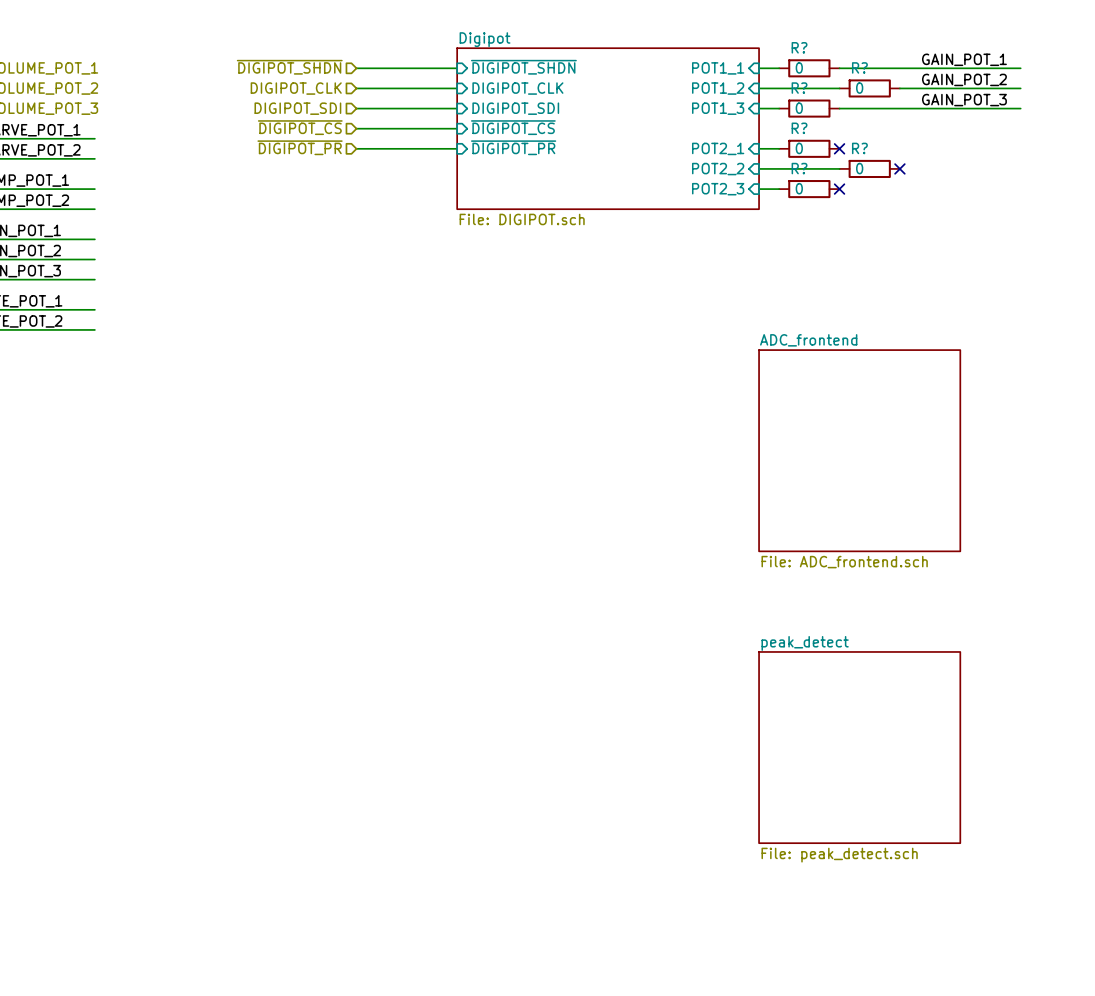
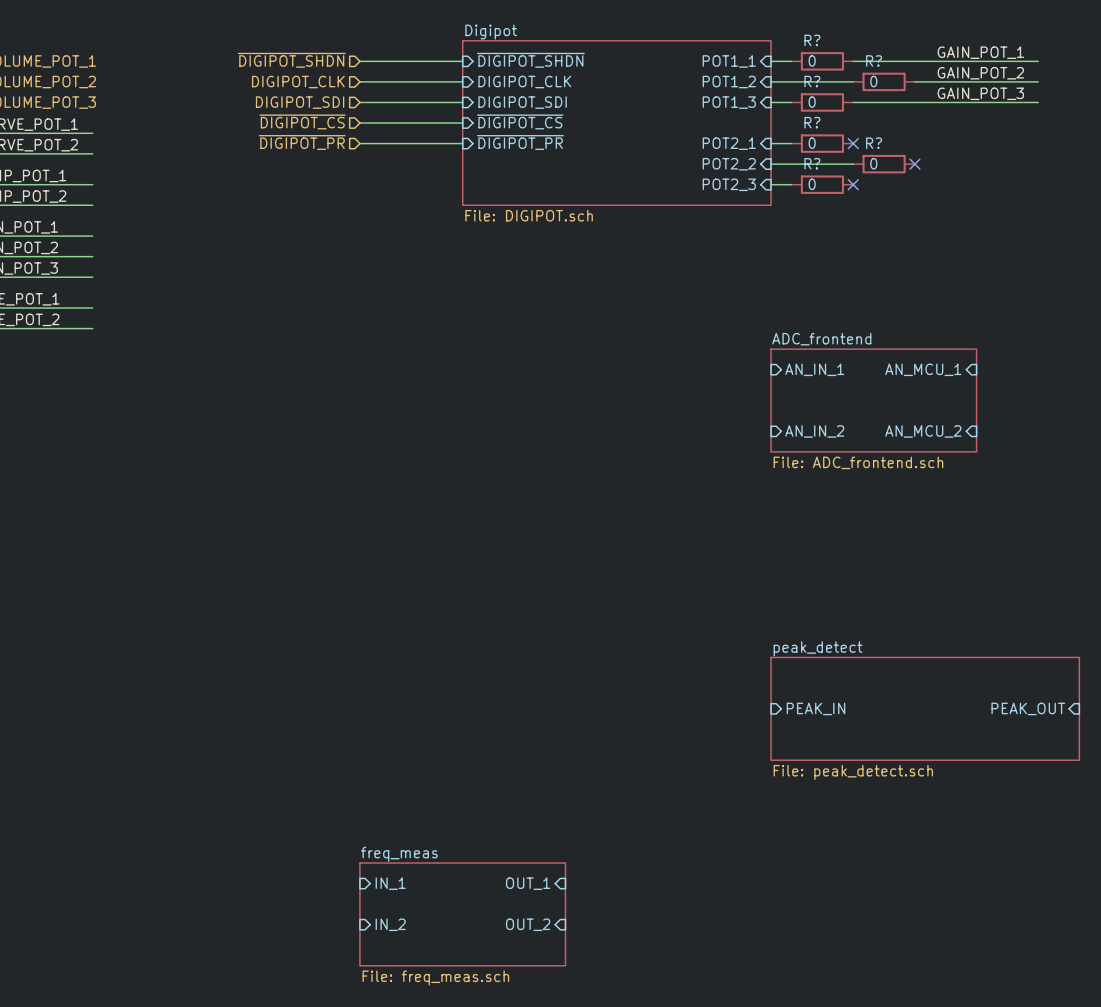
sheet pin: none -> AN_IN_1 (814, 369)
sheet pin: none -> AN_MCU_1 (923, 369)
sheet ADC_frontend: none -> File: ADC_frontend.sch (873, 400)
sheet pin: none -> AN_IN_2 (814, 431)
sheet pin: none -> AN_MCU_2 (923, 431)
sheet ADC_frontend: File: ADC_frontend.sch (859, 450) -> none
sheet pin: none -> PEAK_IN (815, 708)
sheet peak_detect: none -> File: peak_detect.sch (925, 708)
sheet pin: none -> PEAK_OUT (1028, 708)
sheet peak_detect: File: peak_detect.sch (859, 747) -> none
sheet pin: none -> IN_1 (390, 883)
sheet pin: none -> OUT_1 (528, 883)
sheet freq_meas: none -> File: freq_meas.sch (462, 914)
sheet pin: none -> IN_2 (390, 924)
sheet pin: none -> OUT_2 (528, 924)

